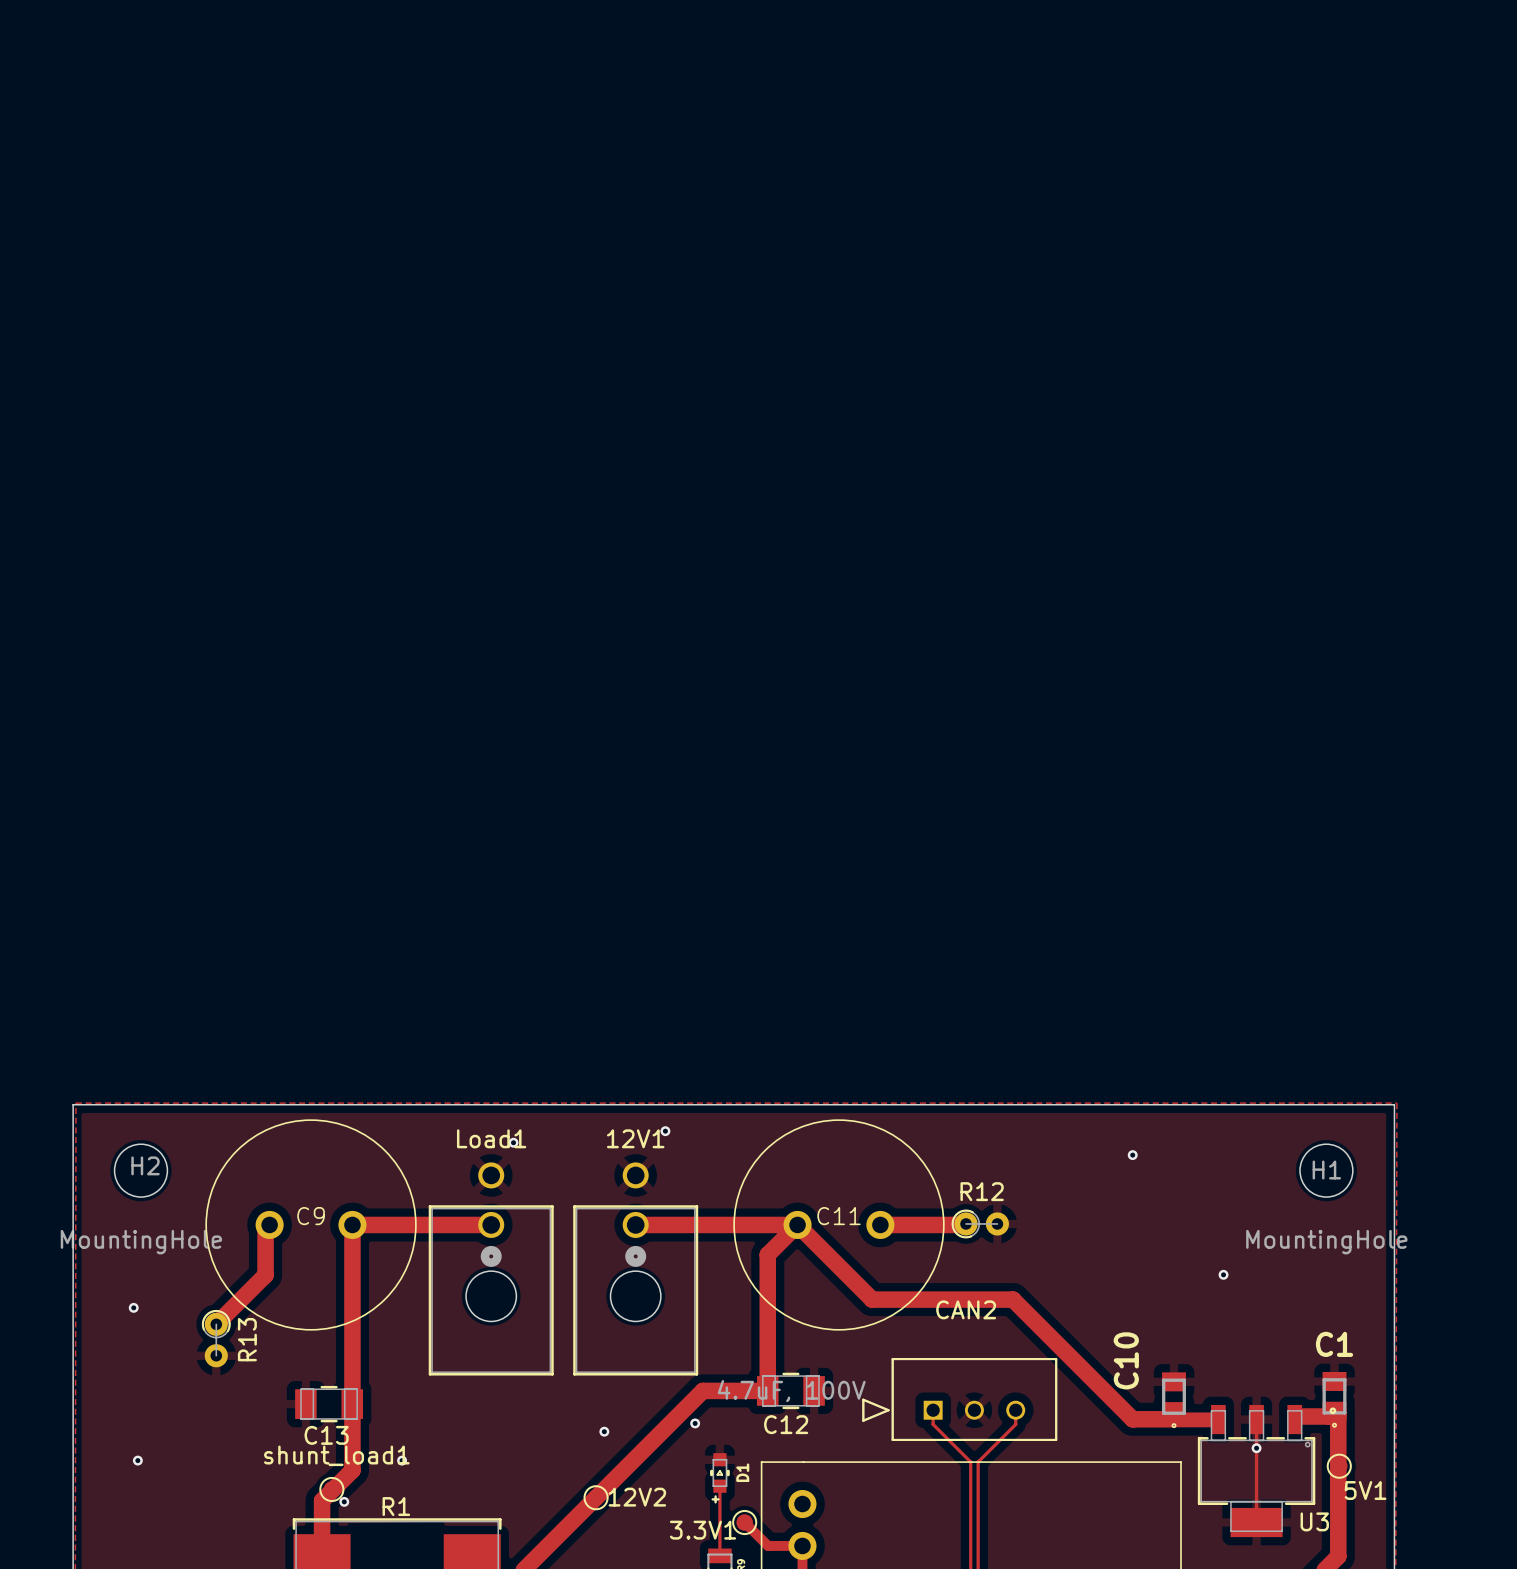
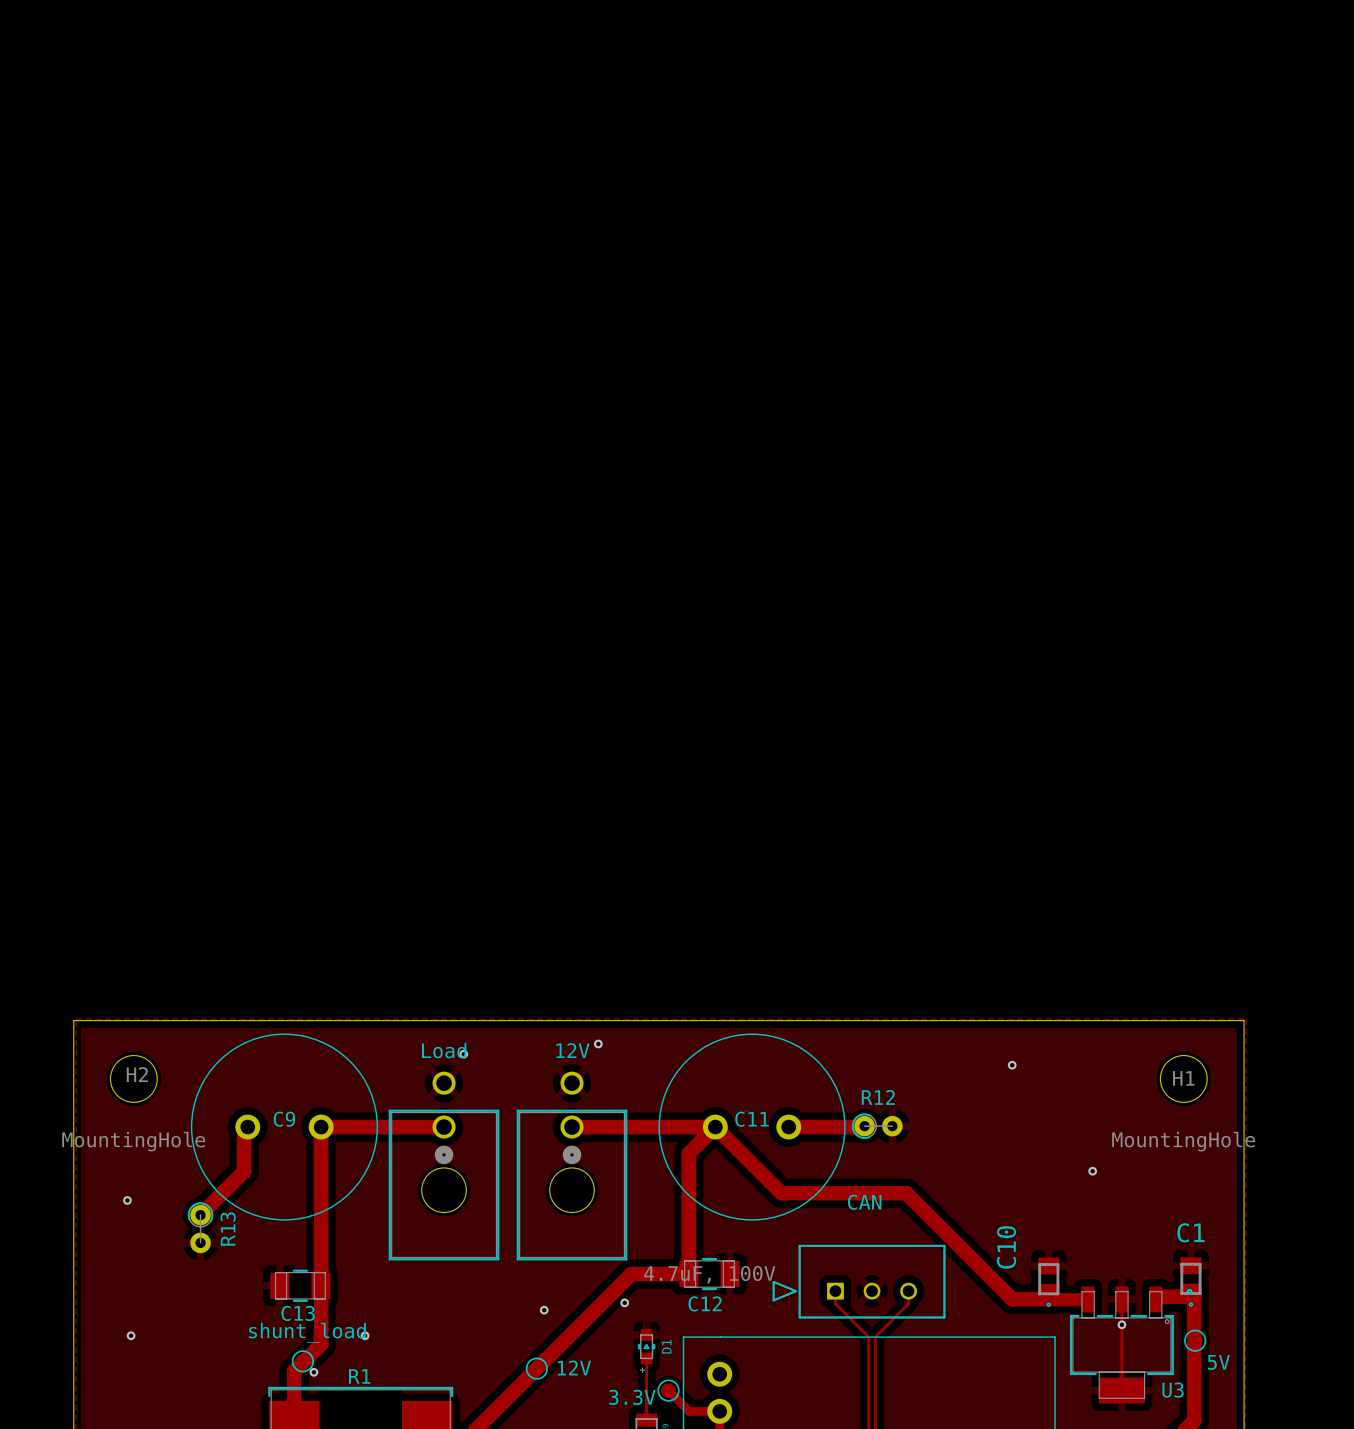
Load1 name: Load1 (491, 1138) -> Load (444, 1050)
12V1 name: 12V1 (635, 1138) -> 12V (572, 1050)
CAN2 name: CAN2 (966, 1309) -> CAN (864, 1202)
shunt_load1 name: shunt_load1 (336, 1455) -> shunt_load (307, 1332)
5V1 name: 5V1 (1365, 1490) -> 5V (1218, 1362)
12V2 name: 12V2 (637, 1497) -> 12V (574, 1367)
3.3V1 name: 3.3V1 (703, 1530) -> 3.3V (632, 1397)

